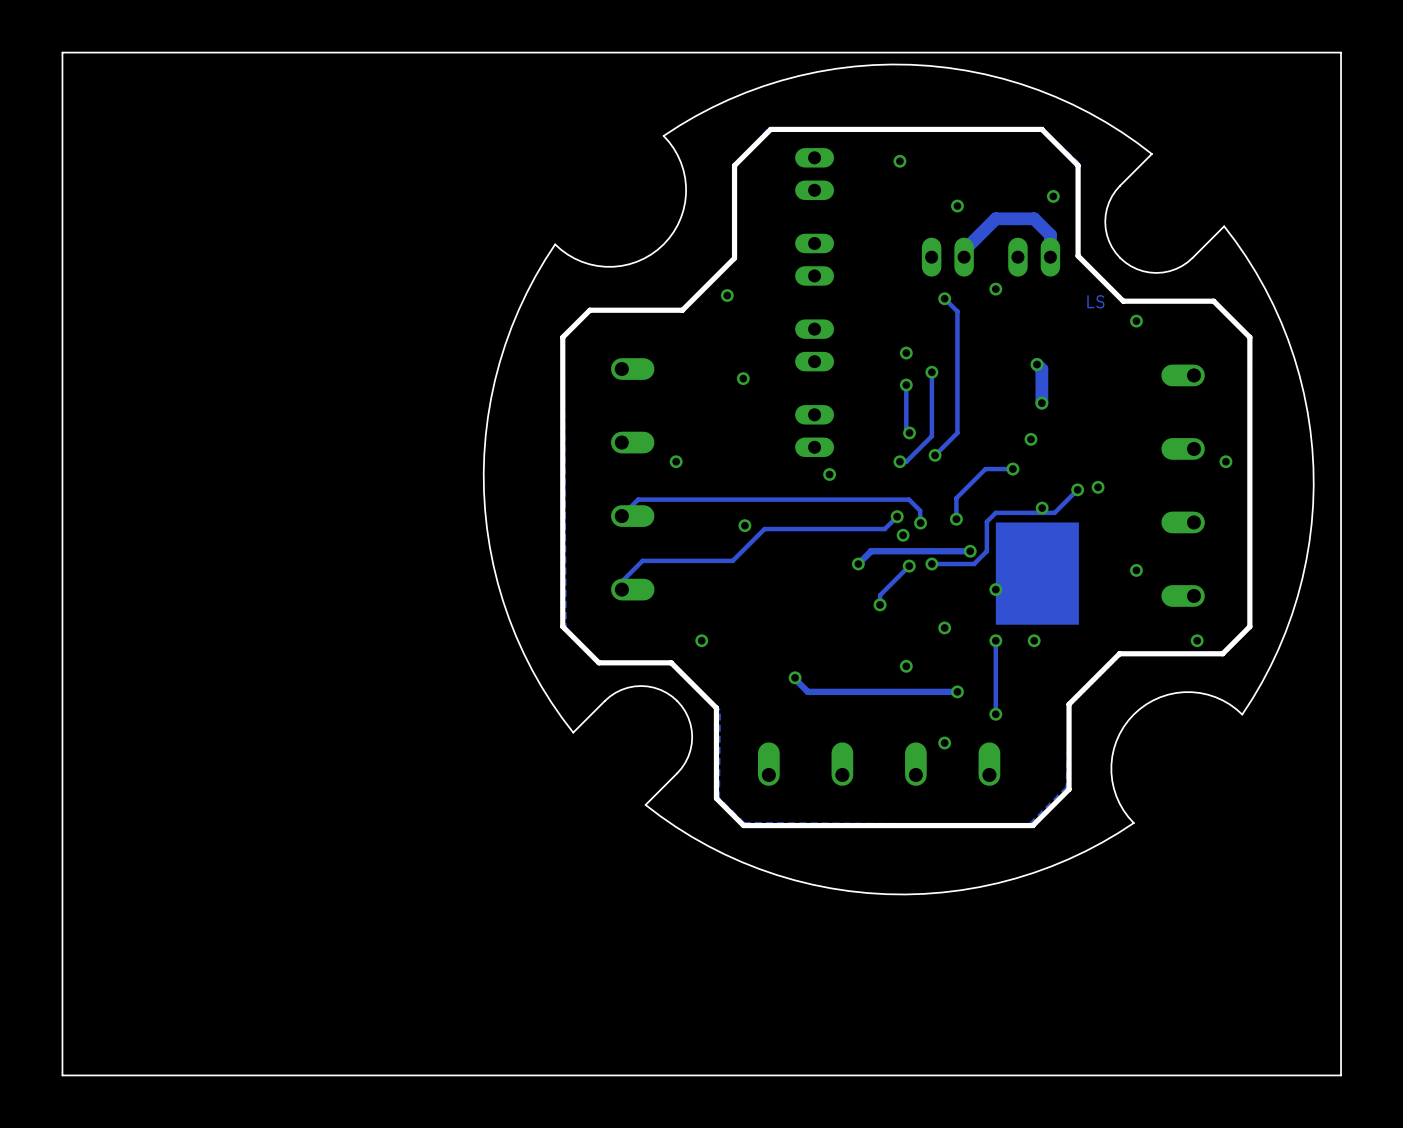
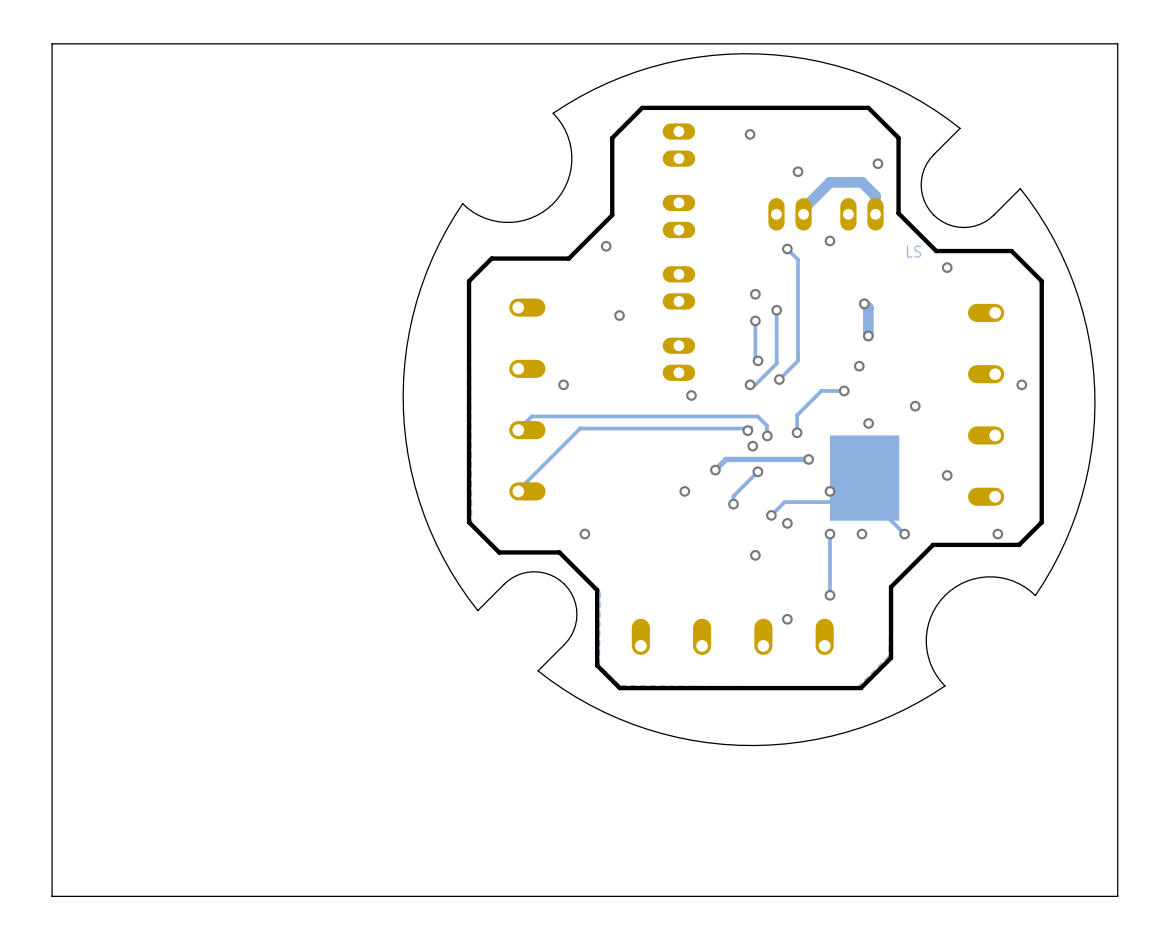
track: (1077, 489) (1054, 512) (995, 512) (986, 521) (986, 551) (974, 564) (931, 564) -> none
via: (1077, 489) -> none
track: (897, 516) (884, 529) (764, 529) (732, 560) (642, 560) (623, 580) (621, 589) -> (751, 427) (580, 428) (518, 491)
via: (744, 525) -> none
via: (931, 564) -> none
via: none -> (684, 491)
track: none -> (771, 515) (784, 502) (872, 502) (904, 534)
via: none -> (771, 515)
via: none -> (904, 534)
track: (795, 677) (807, 691) (957, 691) -> none
via: (795, 677) -> none
via: (957, 691) -> none

